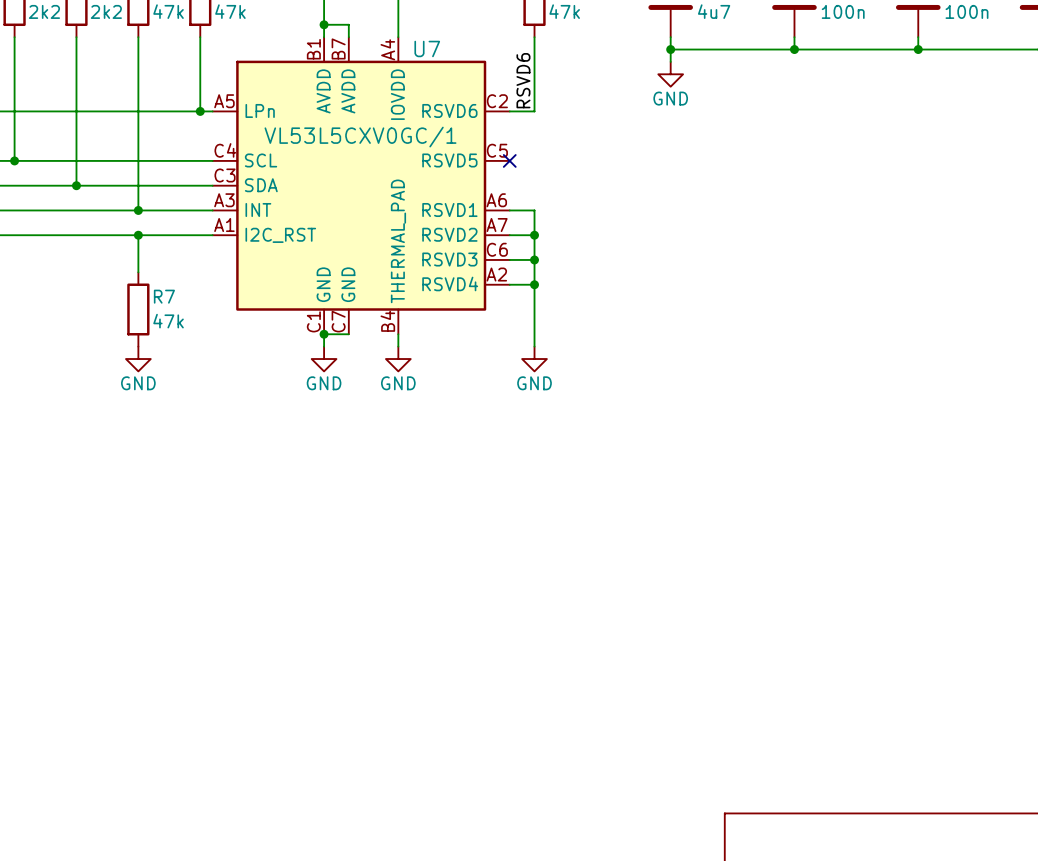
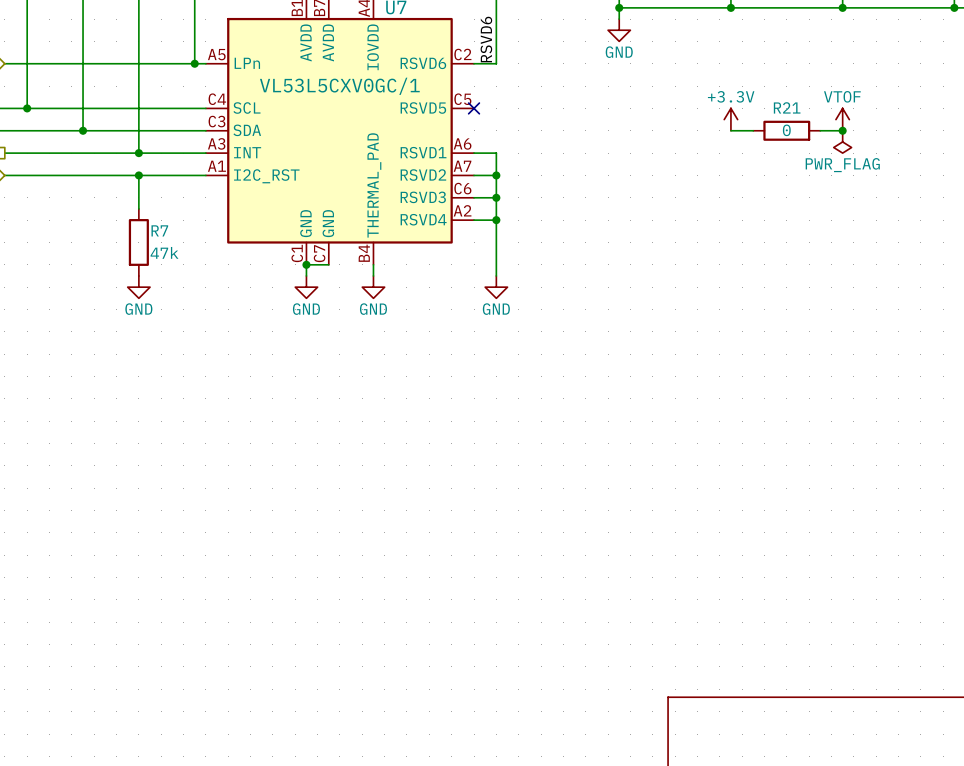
power symbol: none -> +3.3V (730, 119)
power symbol: none -> VTOF (842, 119)
wire: none -> (730, 130) (753, 130)
R21: none -> 0 (786, 130)
wire: none -> (820, 130) (842, 130)
junction: none -> (842, 130)
power symbol: none -> PWR_FLAG (842, 141)

